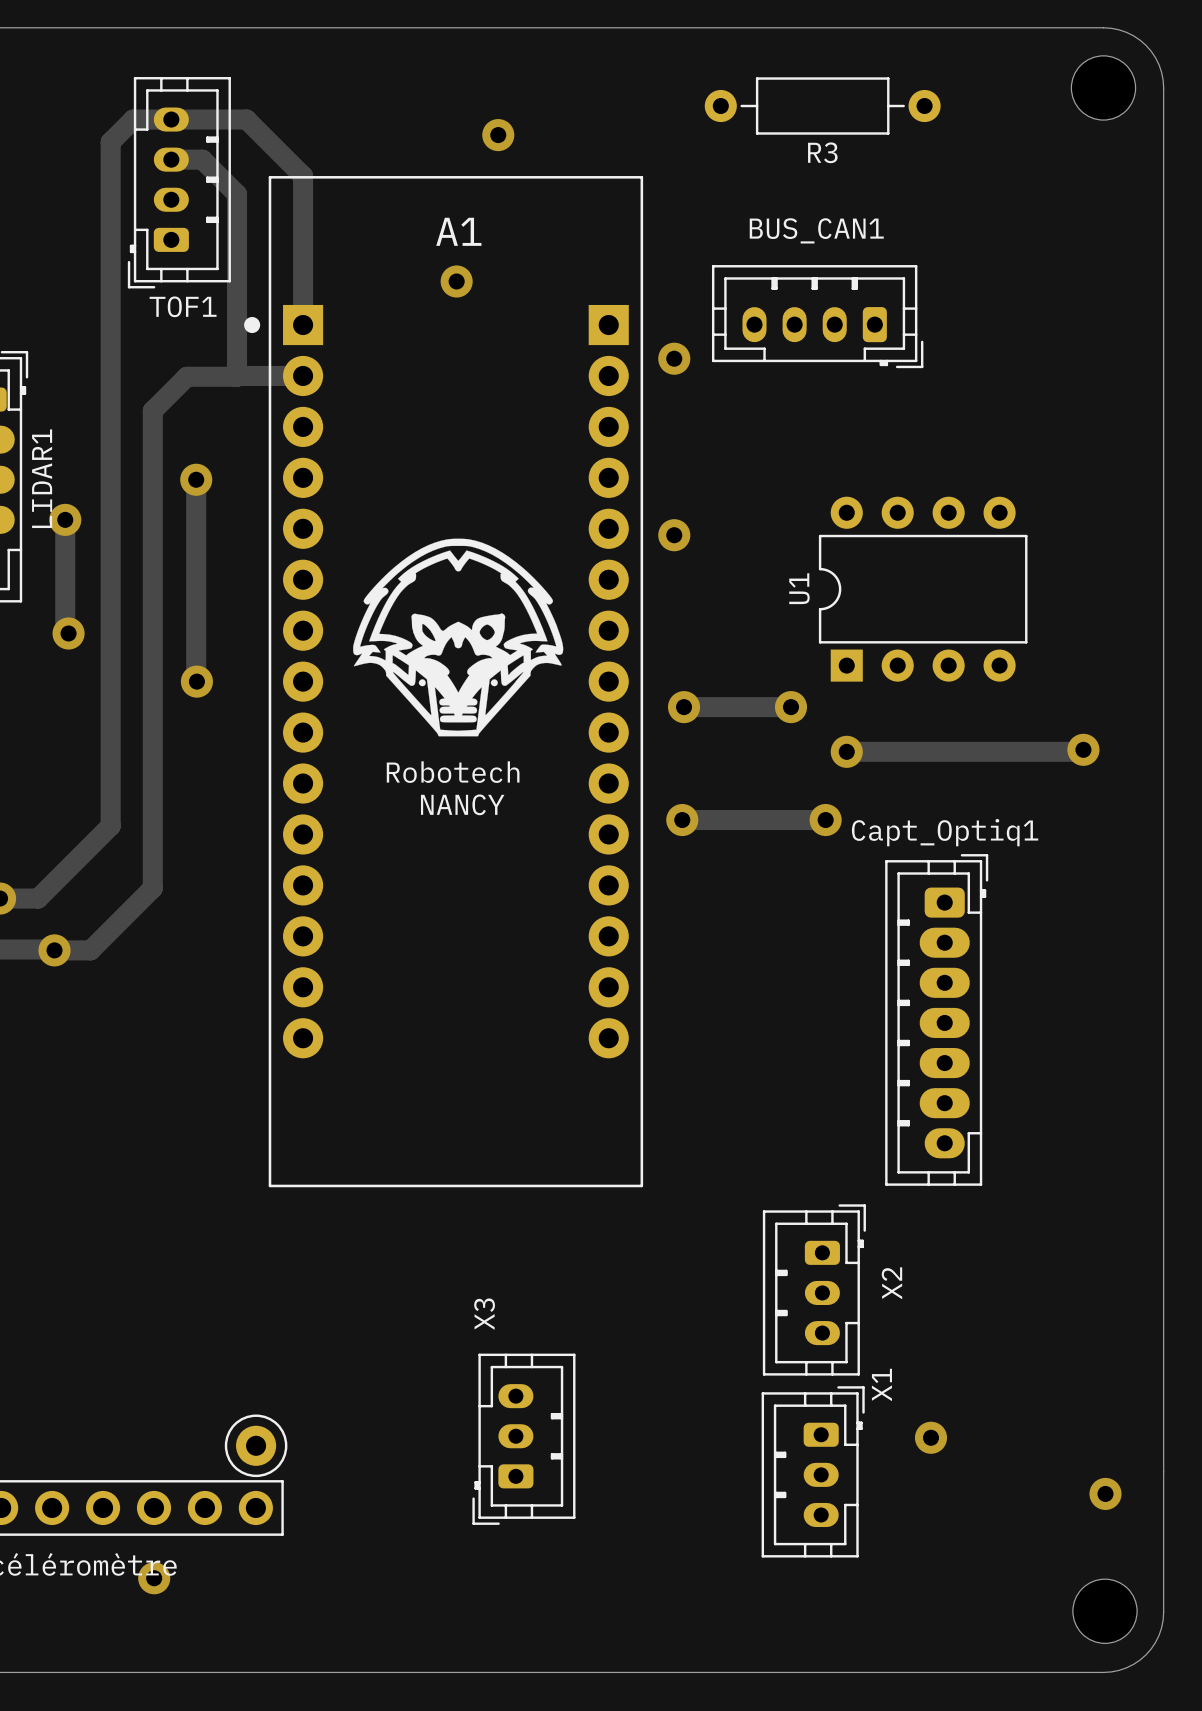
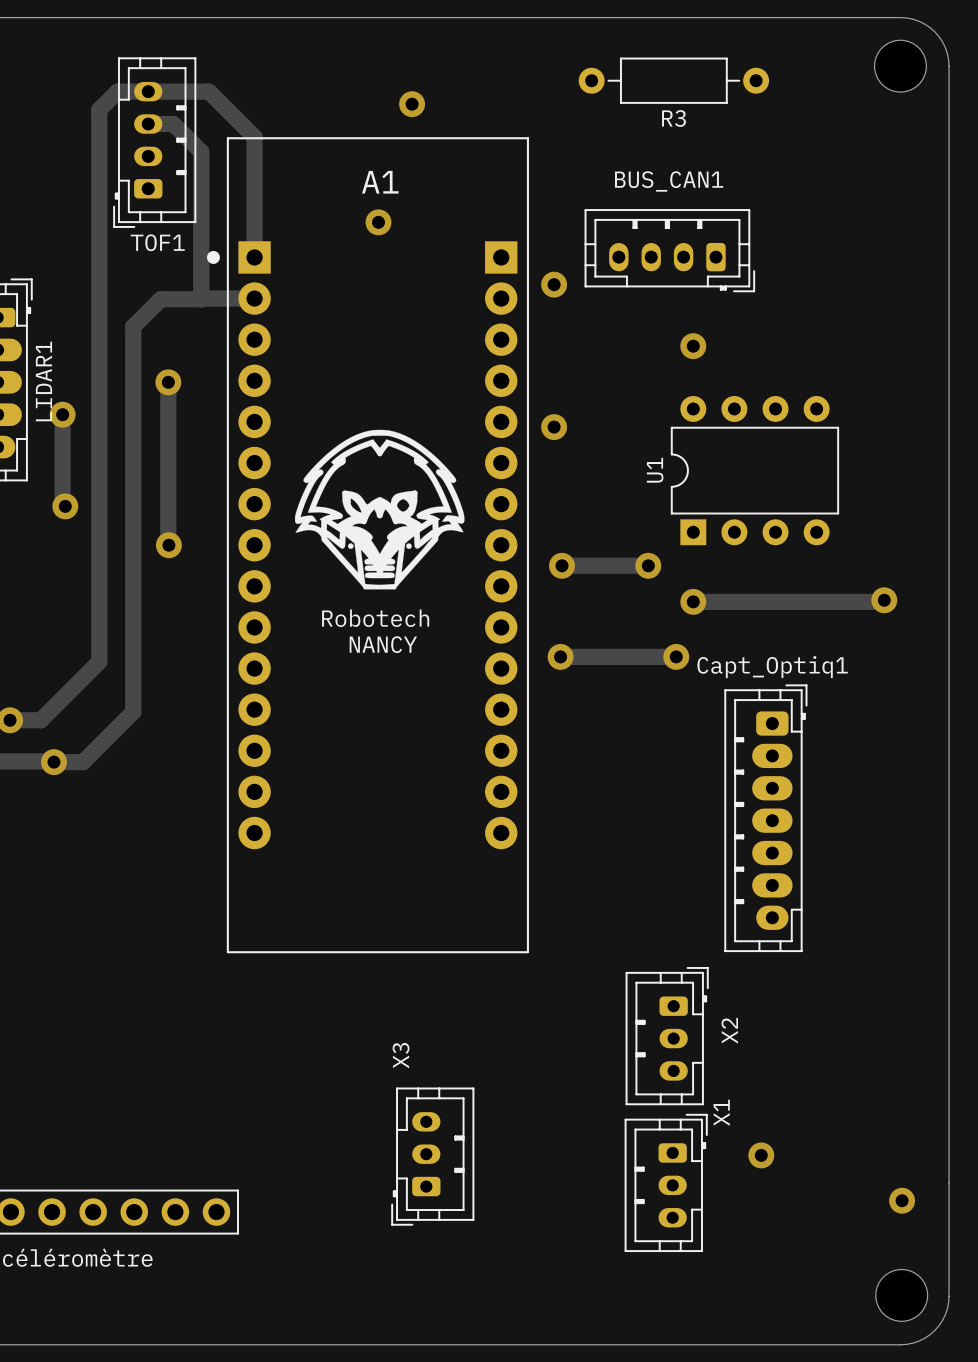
via: none -> (693, 346)
part: (256, 1445) -> none
via: (154, 1578) -> none

